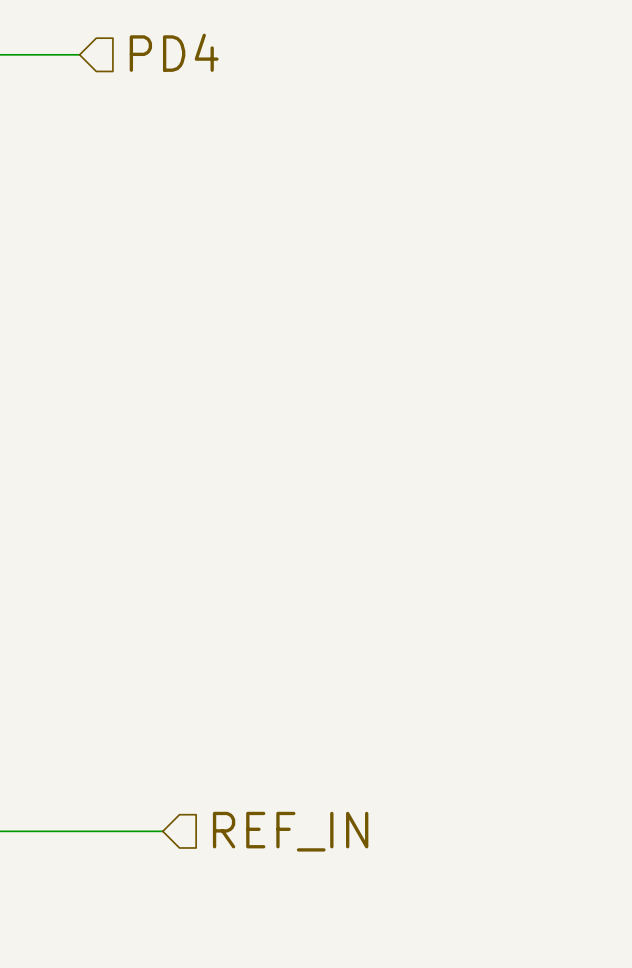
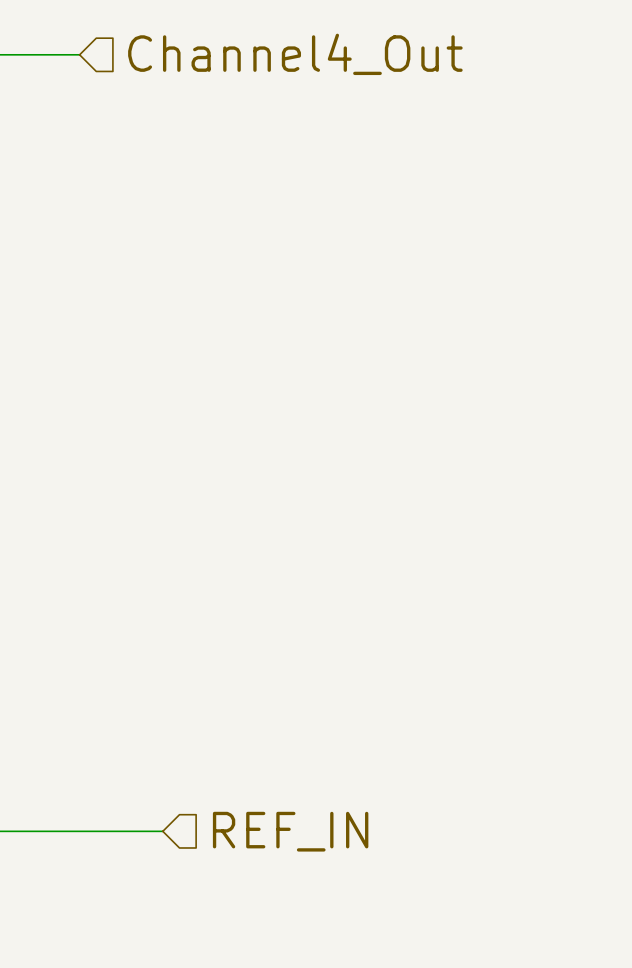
hierarchical label: PD4 (174, 52) -> Channel4_Out (295, 54)

